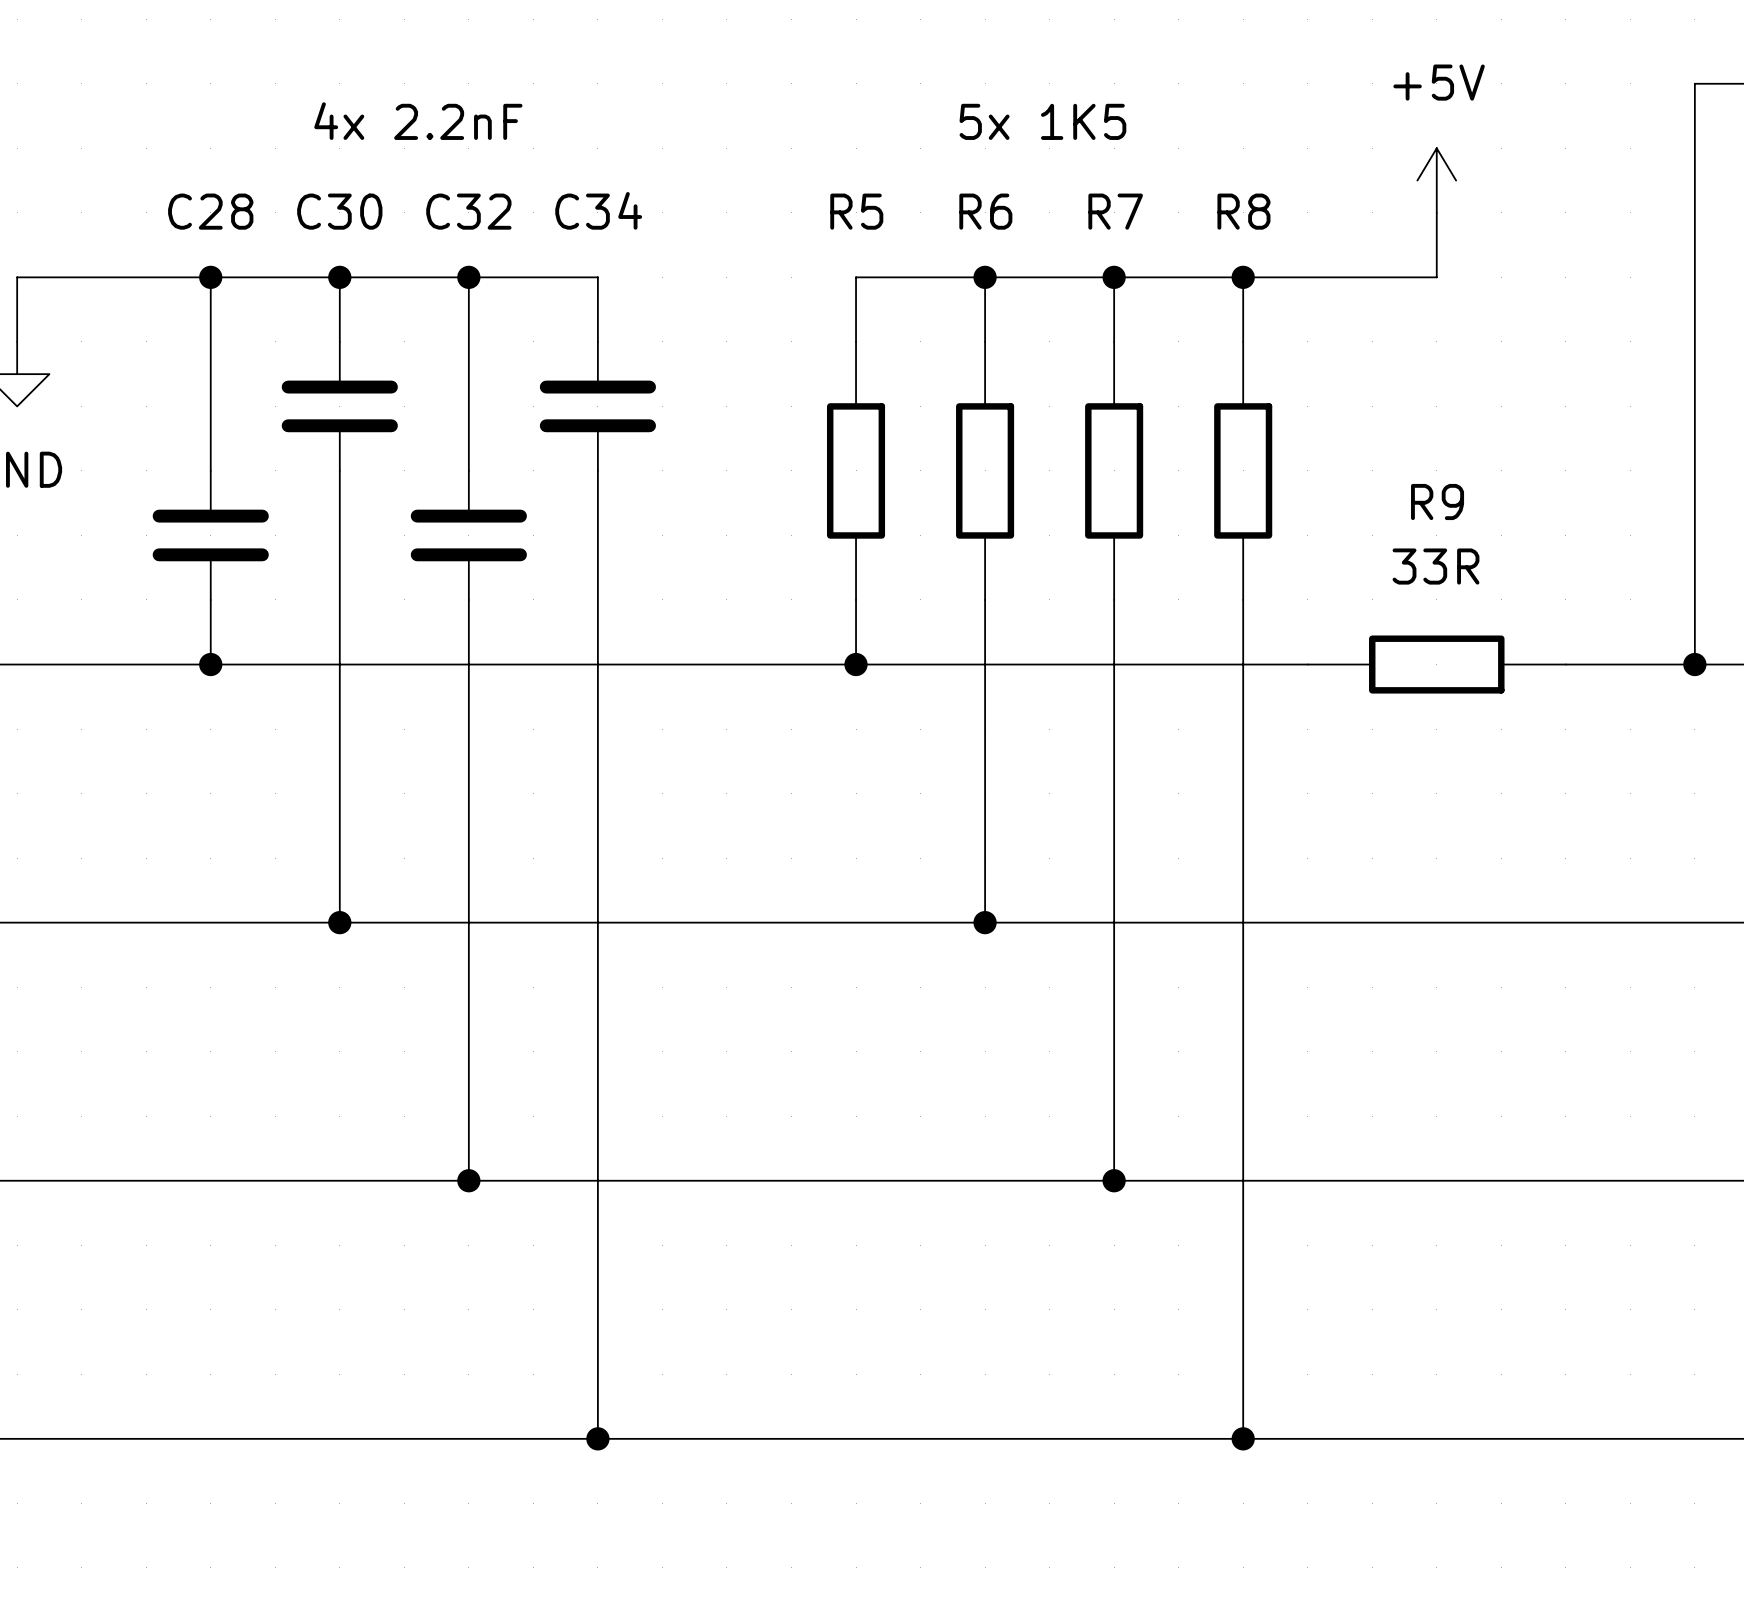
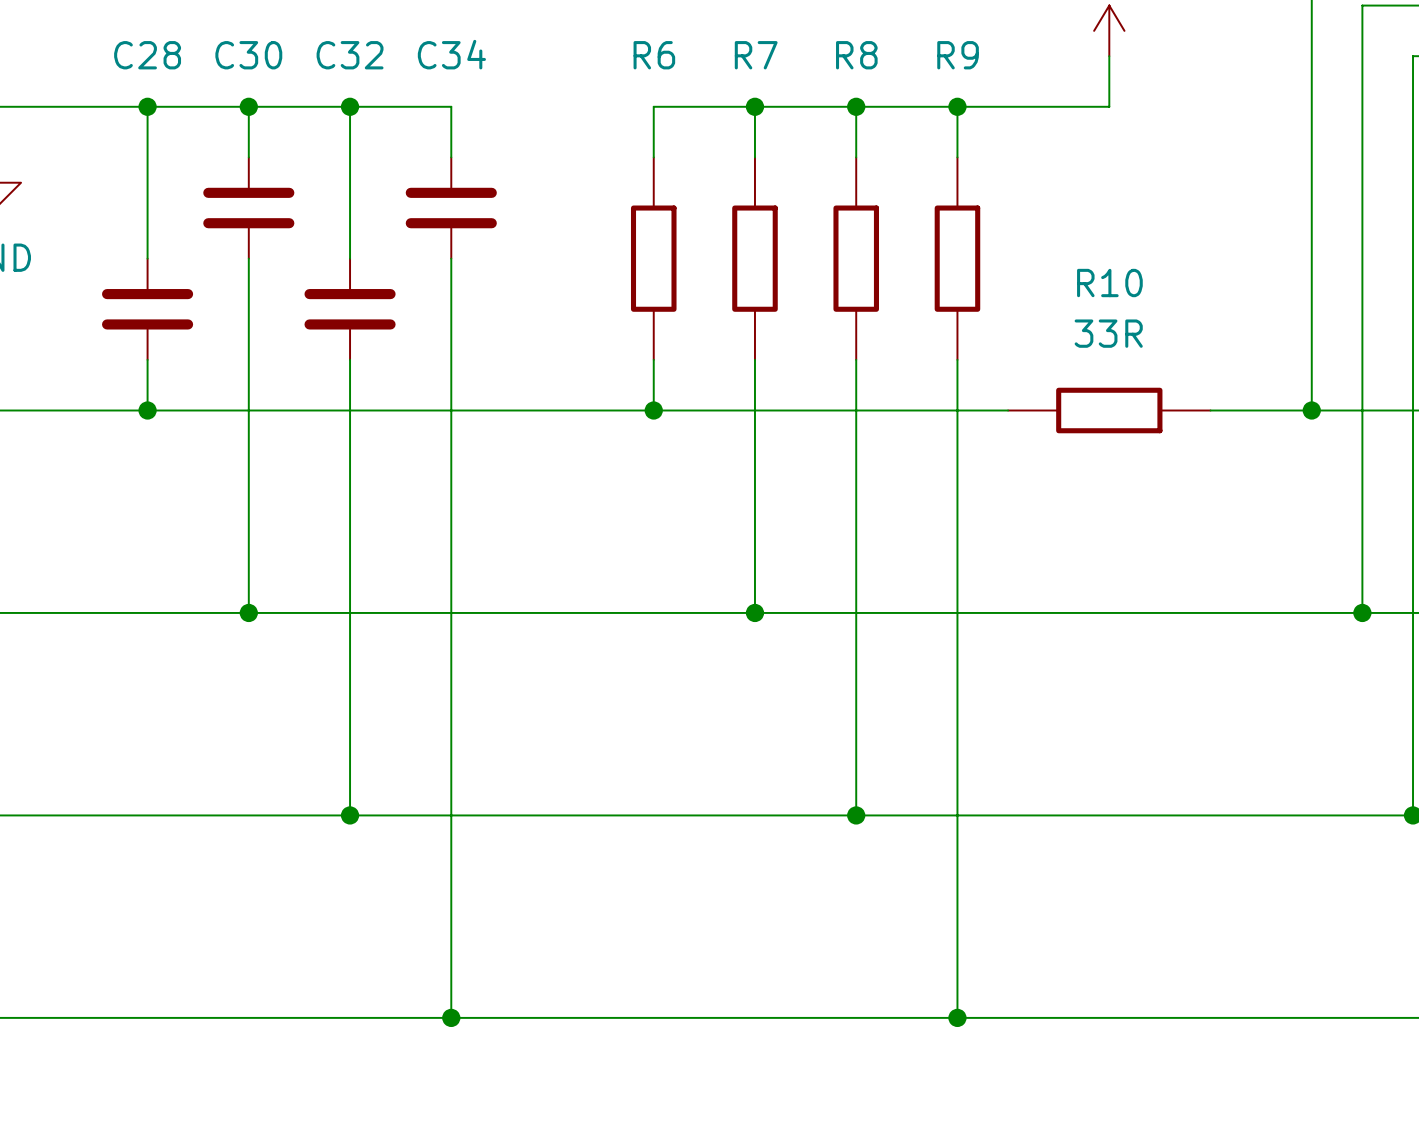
R5 name: R5 (856, 211) -> R6 (654, 55)
R6 name: R6 (985, 211) -> R7 (756, 55)
R7 name: R7 (1115, 211) -> R8 (856, 55)
R8 name: R8 (1243, 211) -> R9 (958, 55)
R9 name: R9 (1437, 502) -> R10 (1109, 283)

